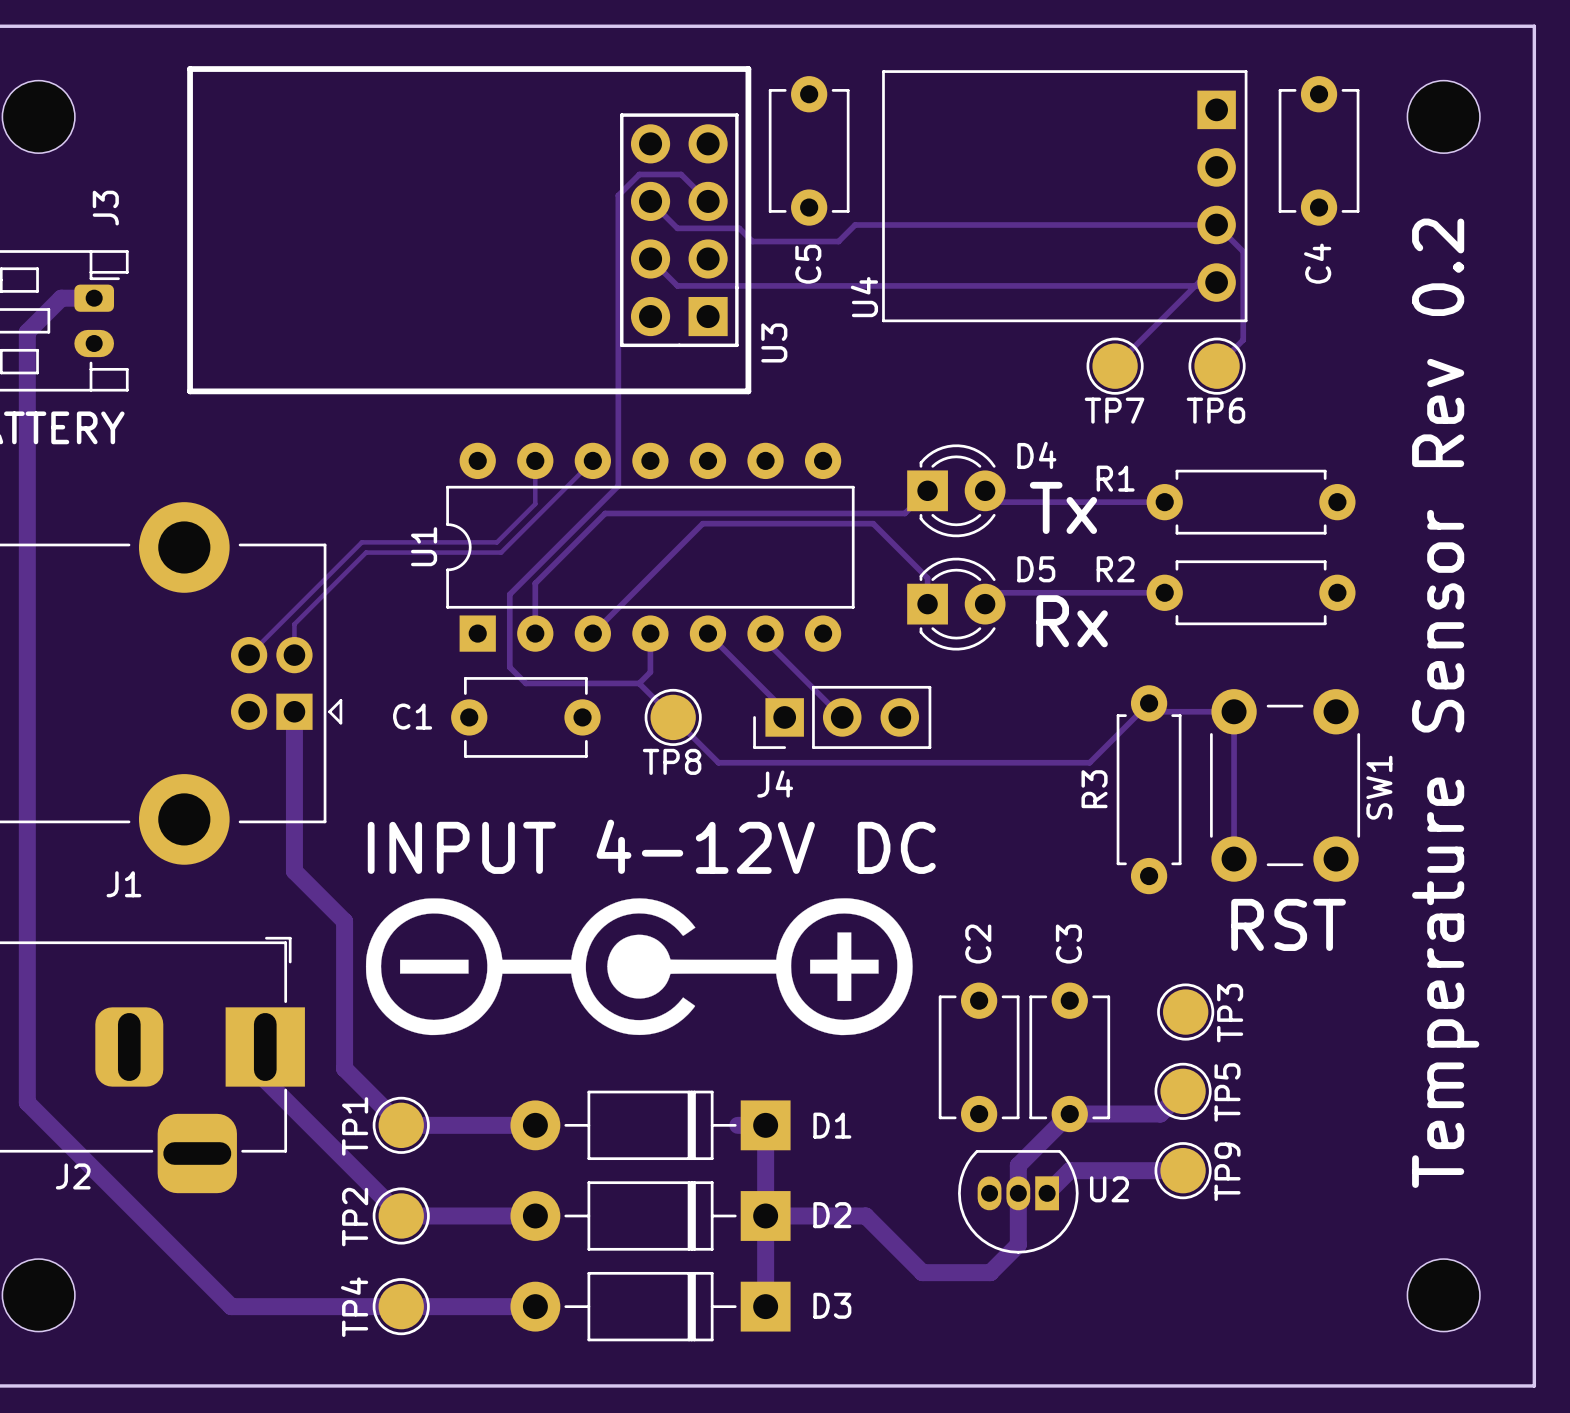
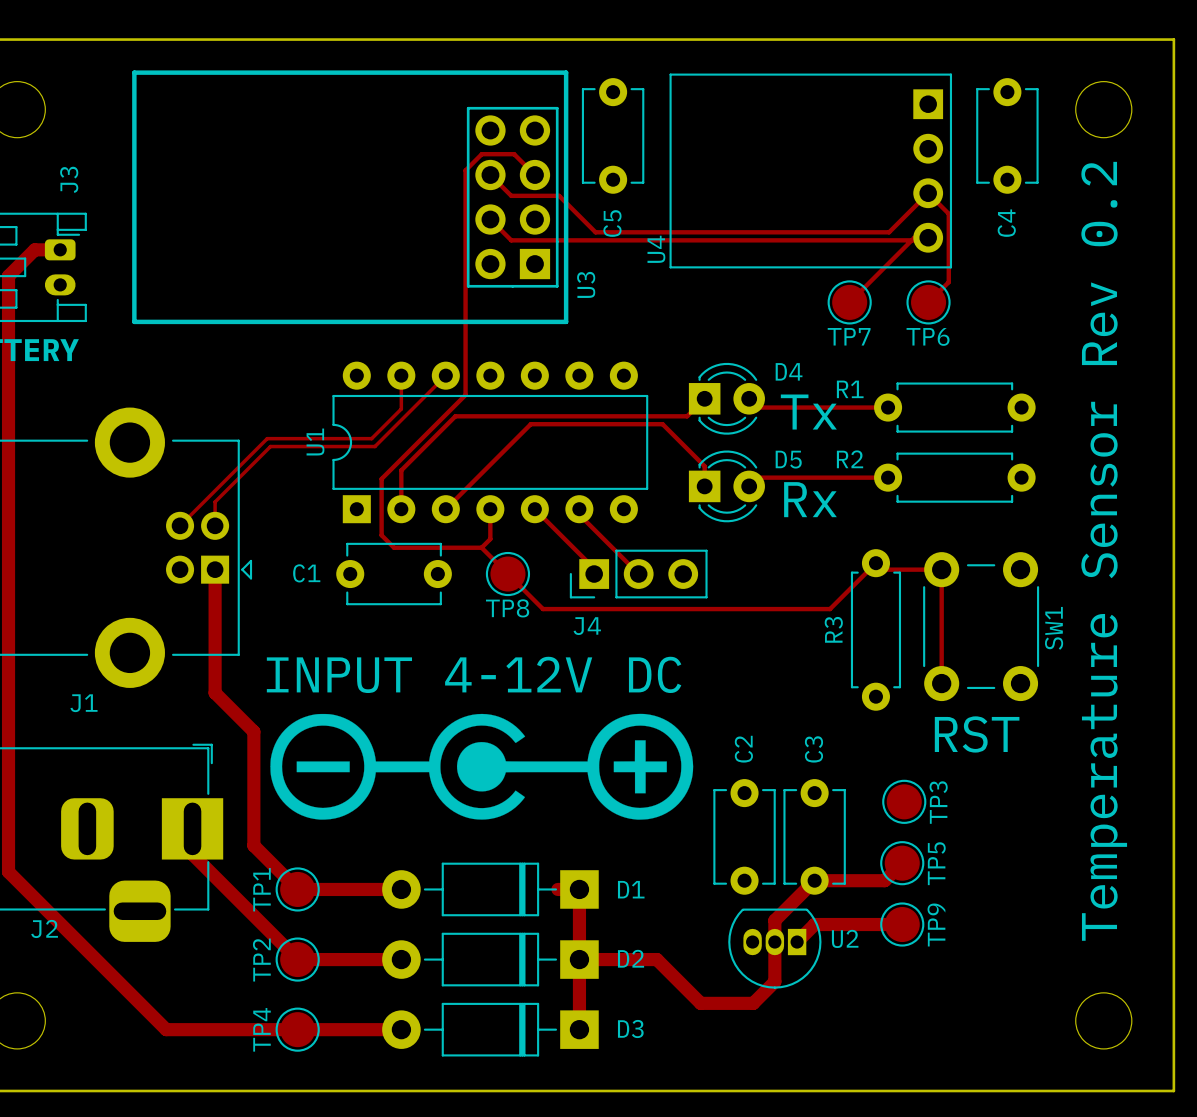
track: (1216, 224) (855, 224) (838, 241) (752, 241) -> (928, 193) (889, 232) (595, 232) (569, 206)

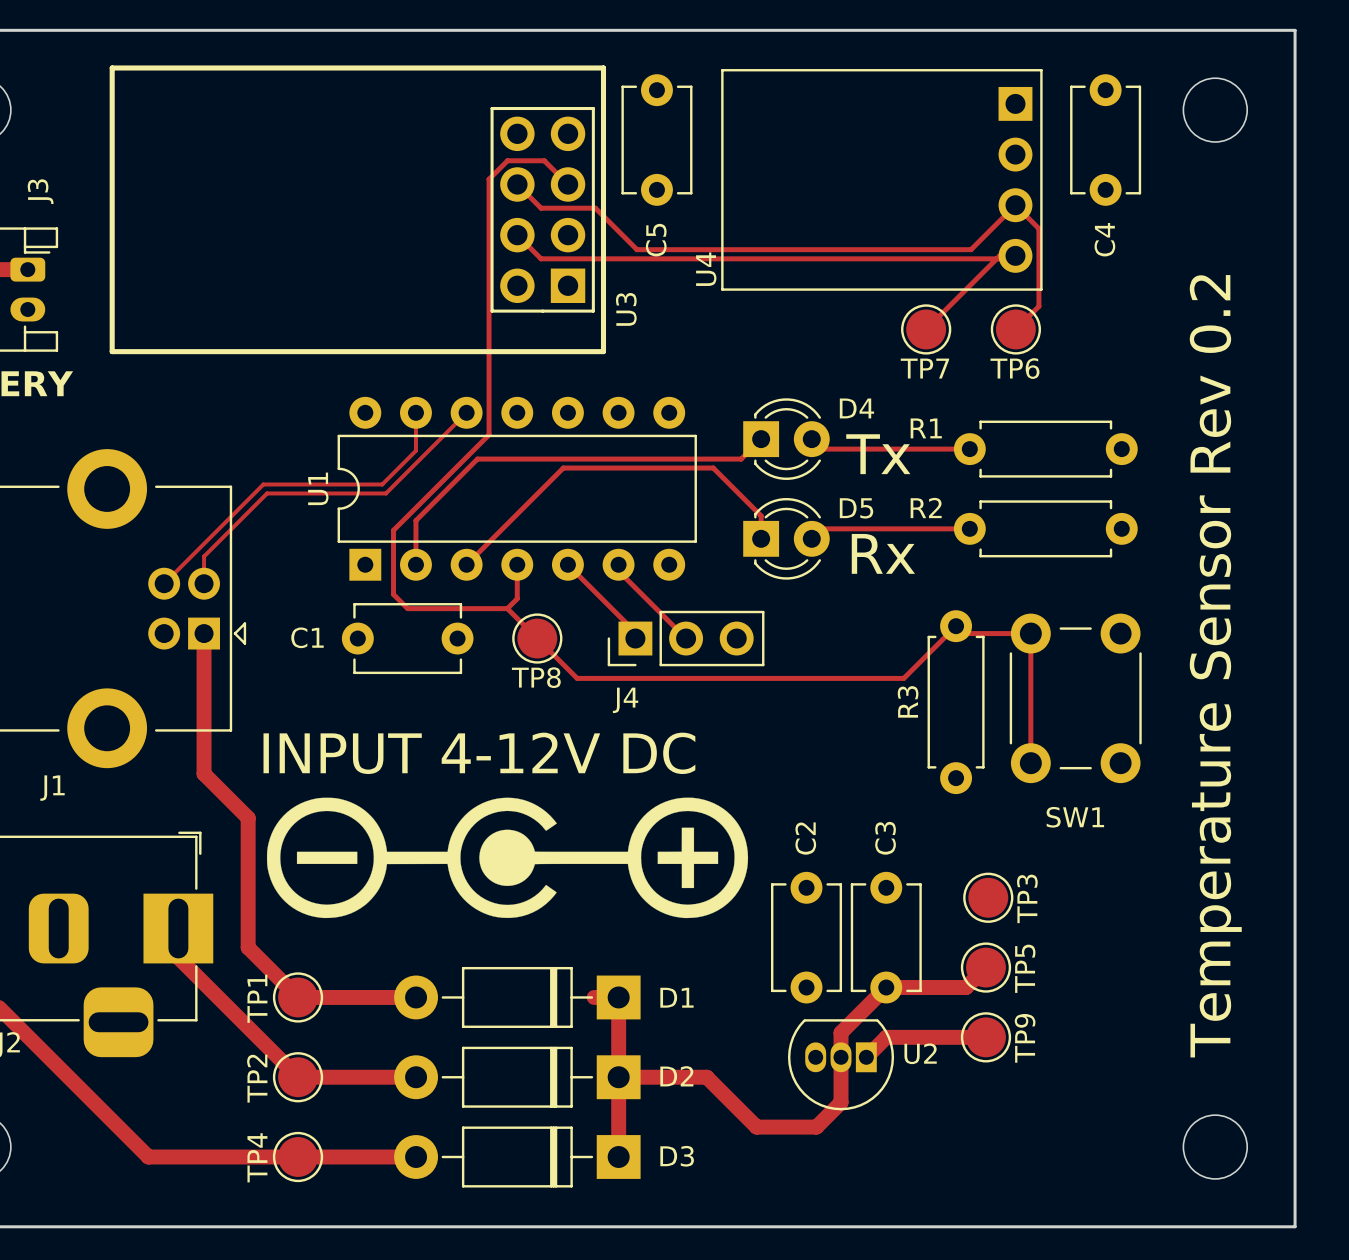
SW1 name rotation: 0° (1054, 628) -> 90° clockwise (1075, 817)
SW1 name position: SW1 (1054, 628) -> SW1 (1075, 817)
text: RST (977, 734) -> none

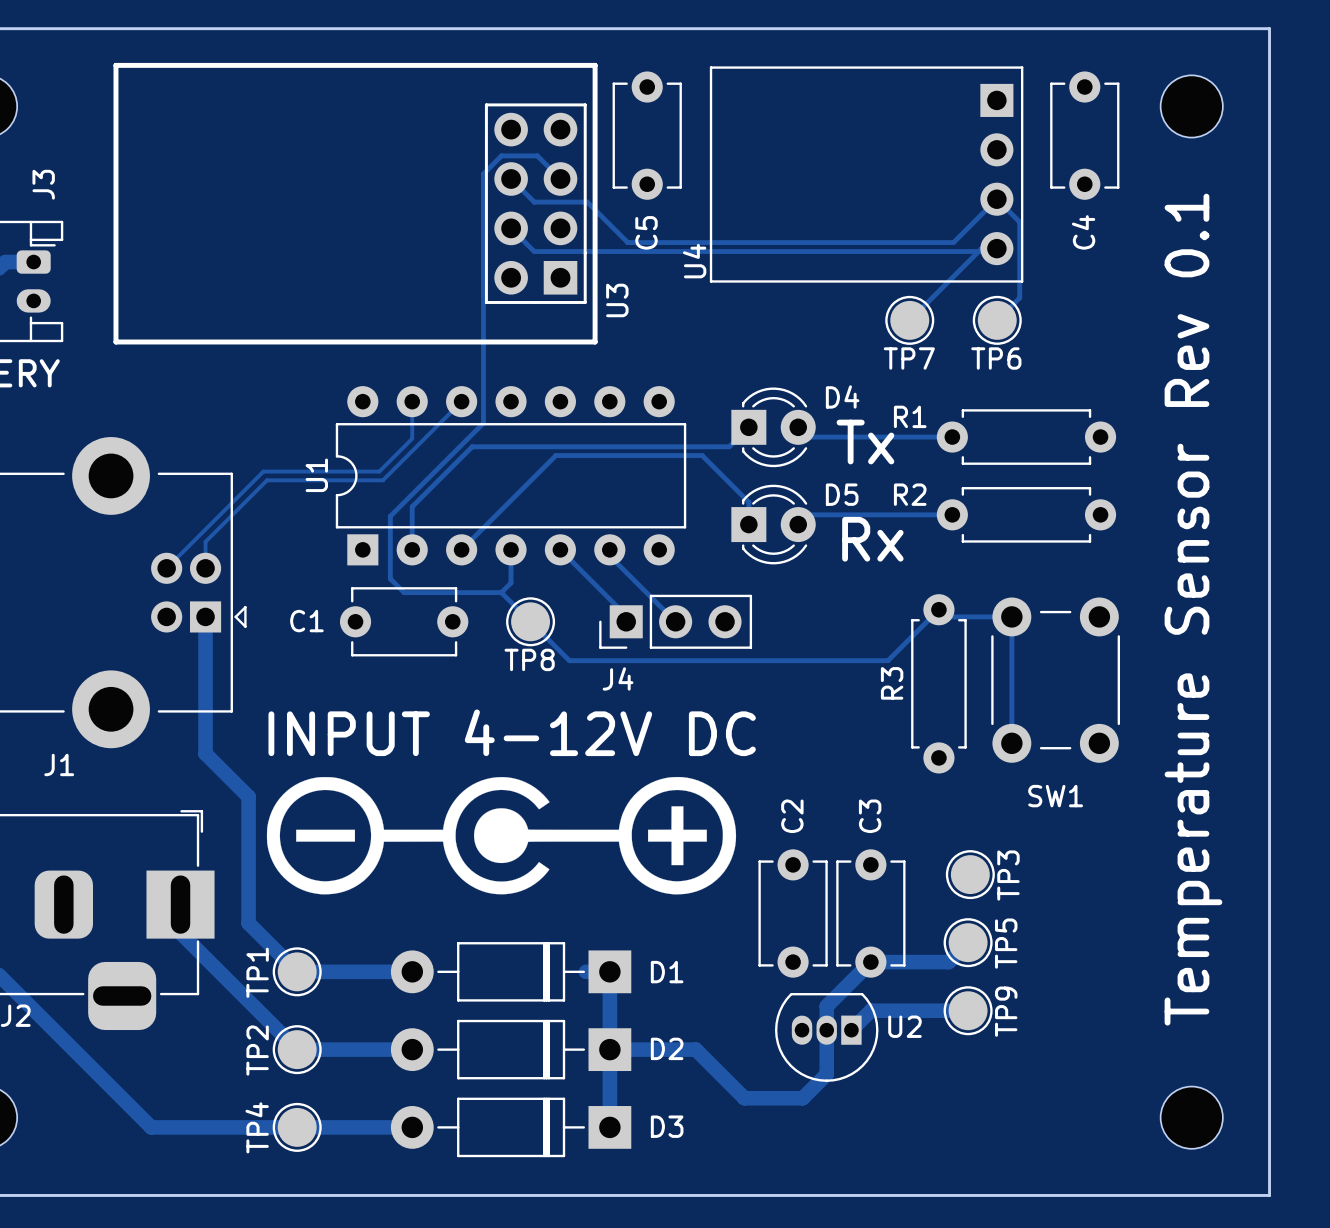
text: Temperature Sensor Rev 0.2 (1215, 666) -> Temperature Sensor Rev 0.1 (1193, 609)

